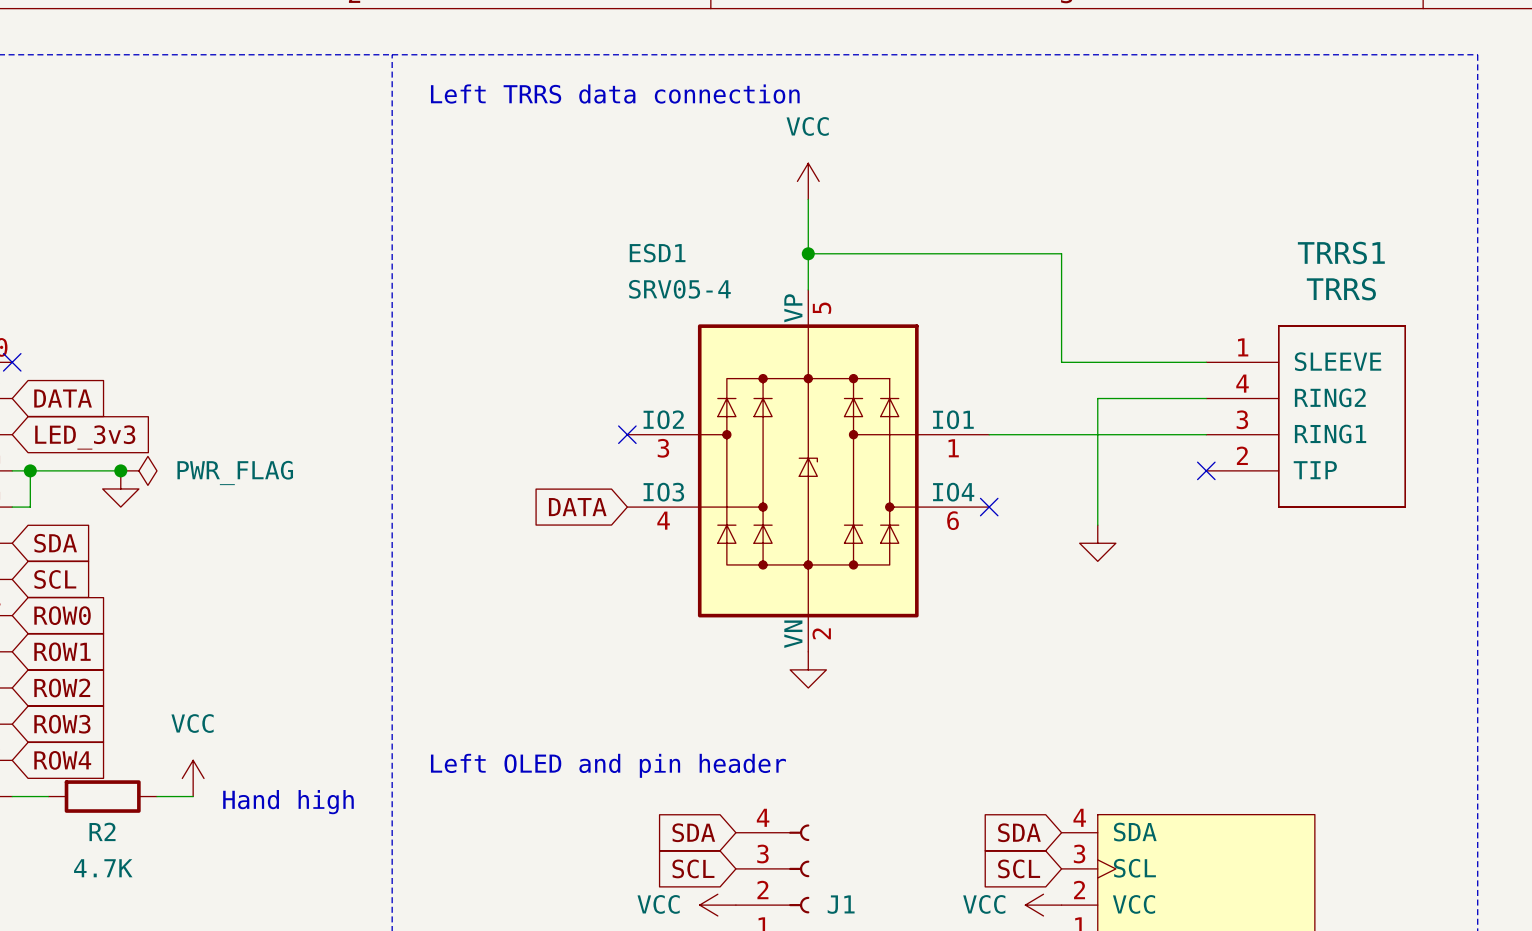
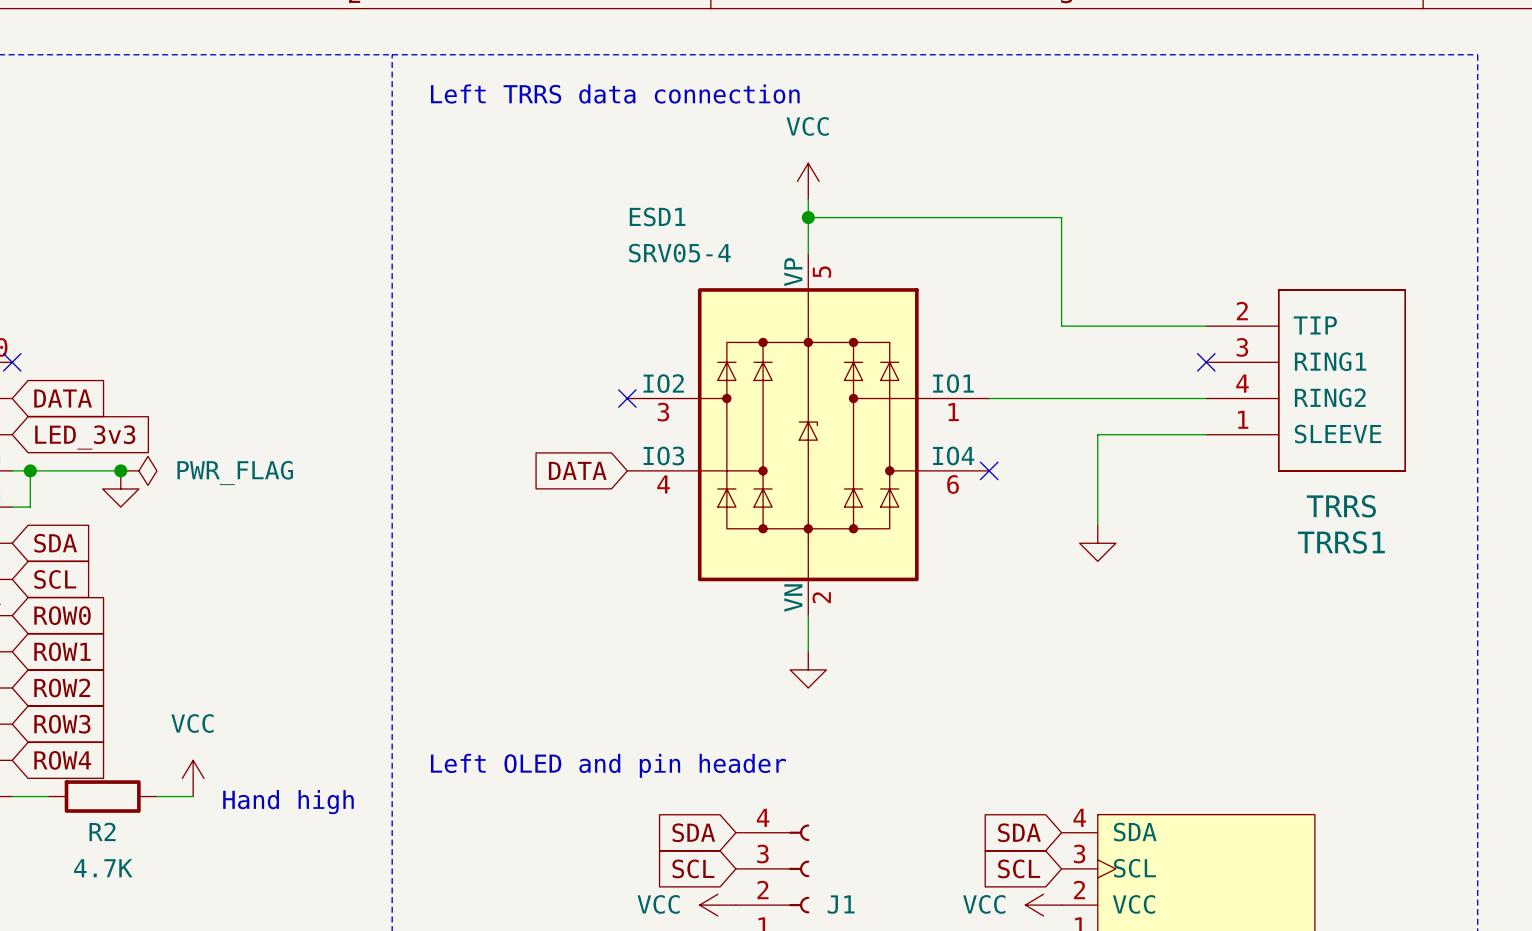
junction position: (808, 253) -> (808, 217)
wire: (1061, 253) (808, 253) (808, 289) -> (1061, 253) (1061, 217) (808, 217)
wire: (1061, 326) (1061, 362) (1206, 362) -> (1061, 326) (1206, 326)
no-connect mark: none -> (1206, 362)
wire: (1097, 398) (1097, 434) (989, 434) -> (1097, 398) (989, 398)
TRRS1 flip: as is (1342, 416) -> up-down (1342, 380)
no-connect mark position: (627, 434) -> (627, 398)
ESD1 position: (808, 470) -> (808, 434)
no-connect mark: (1206, 470) -> none
global label position: DATA (577, 507) -> DATA (577, 470)
no-connect mark position: (989, 507) -> (989, 470)

